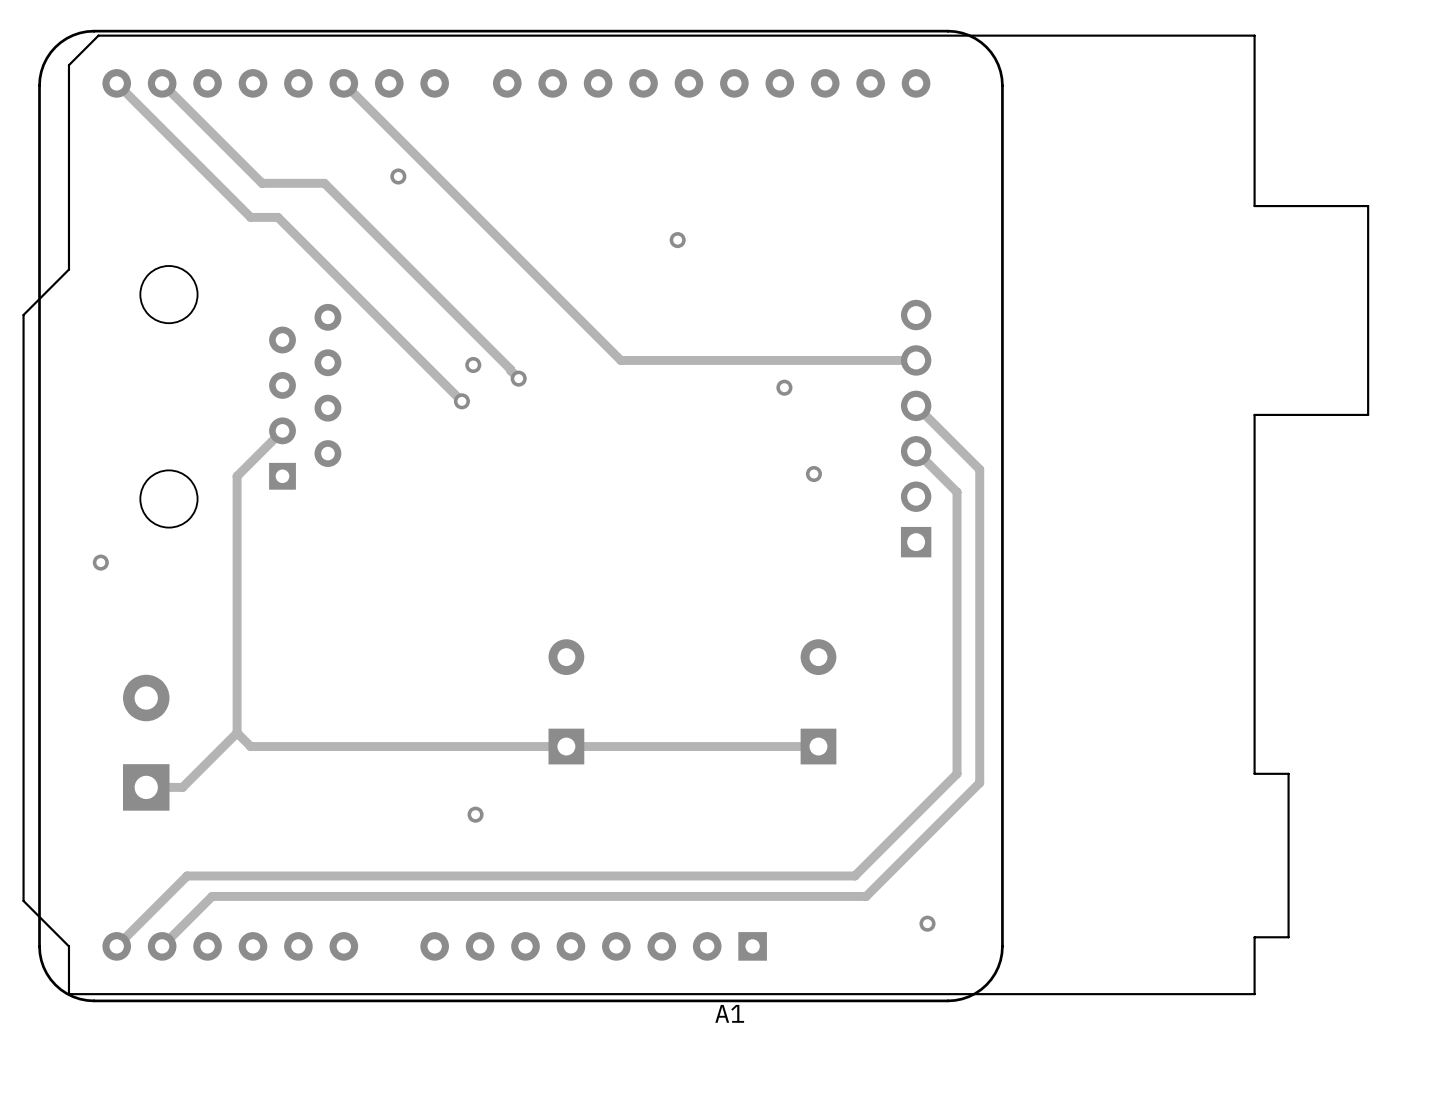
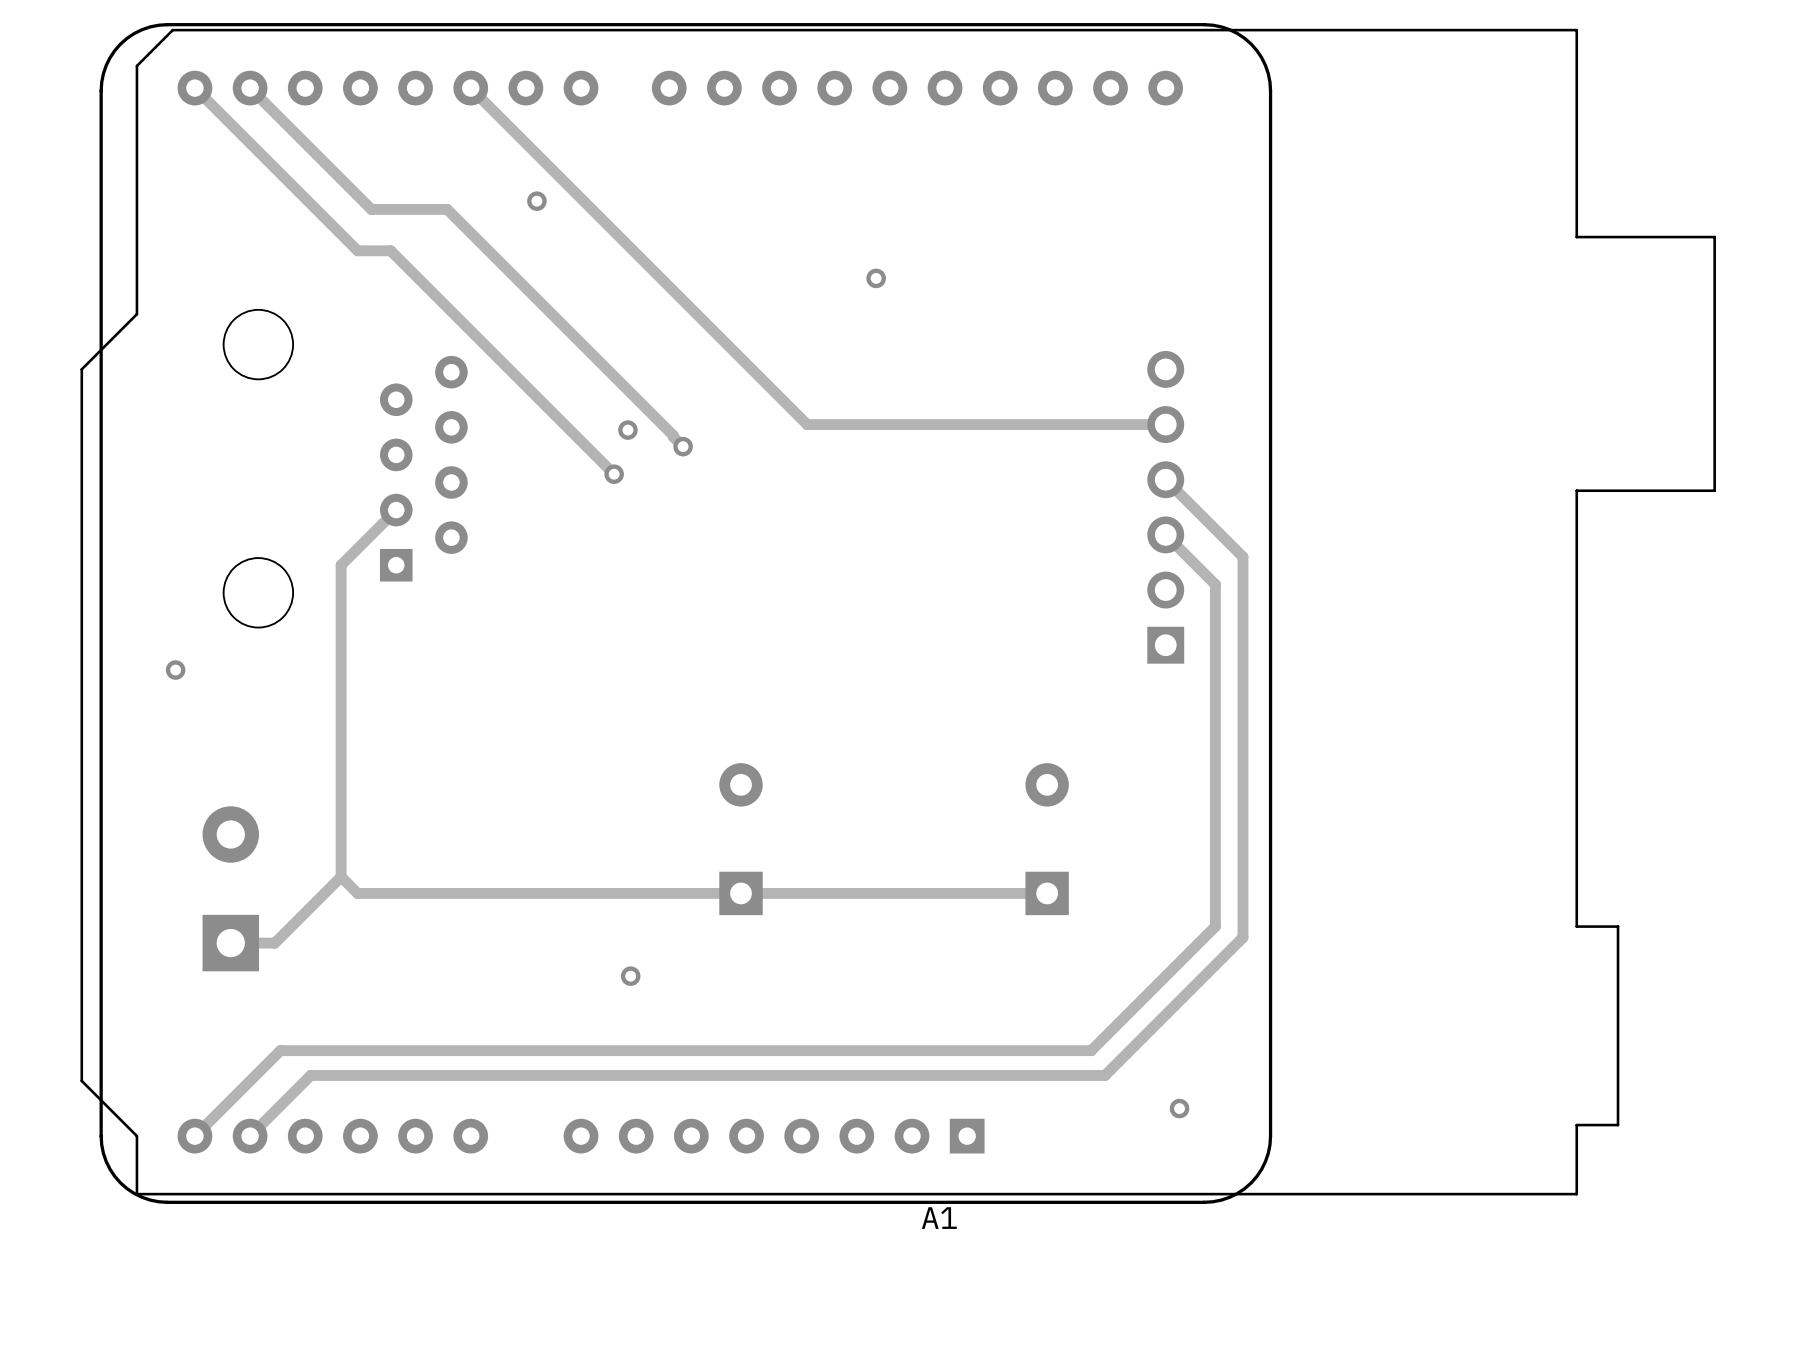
via: (784, 387) -> none
via: (813, 474) -> none

